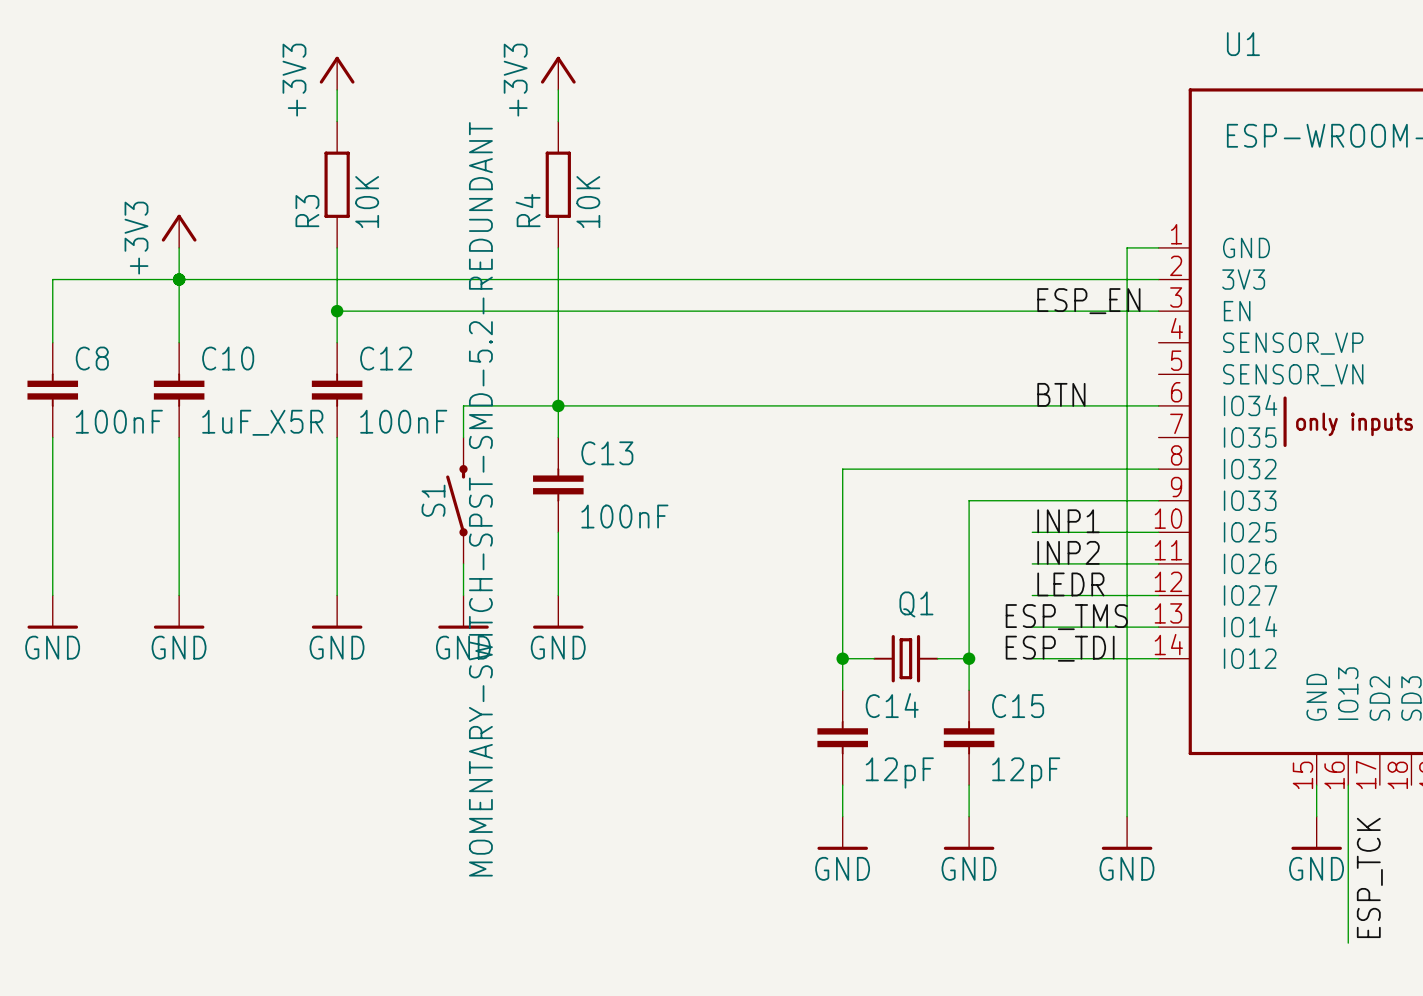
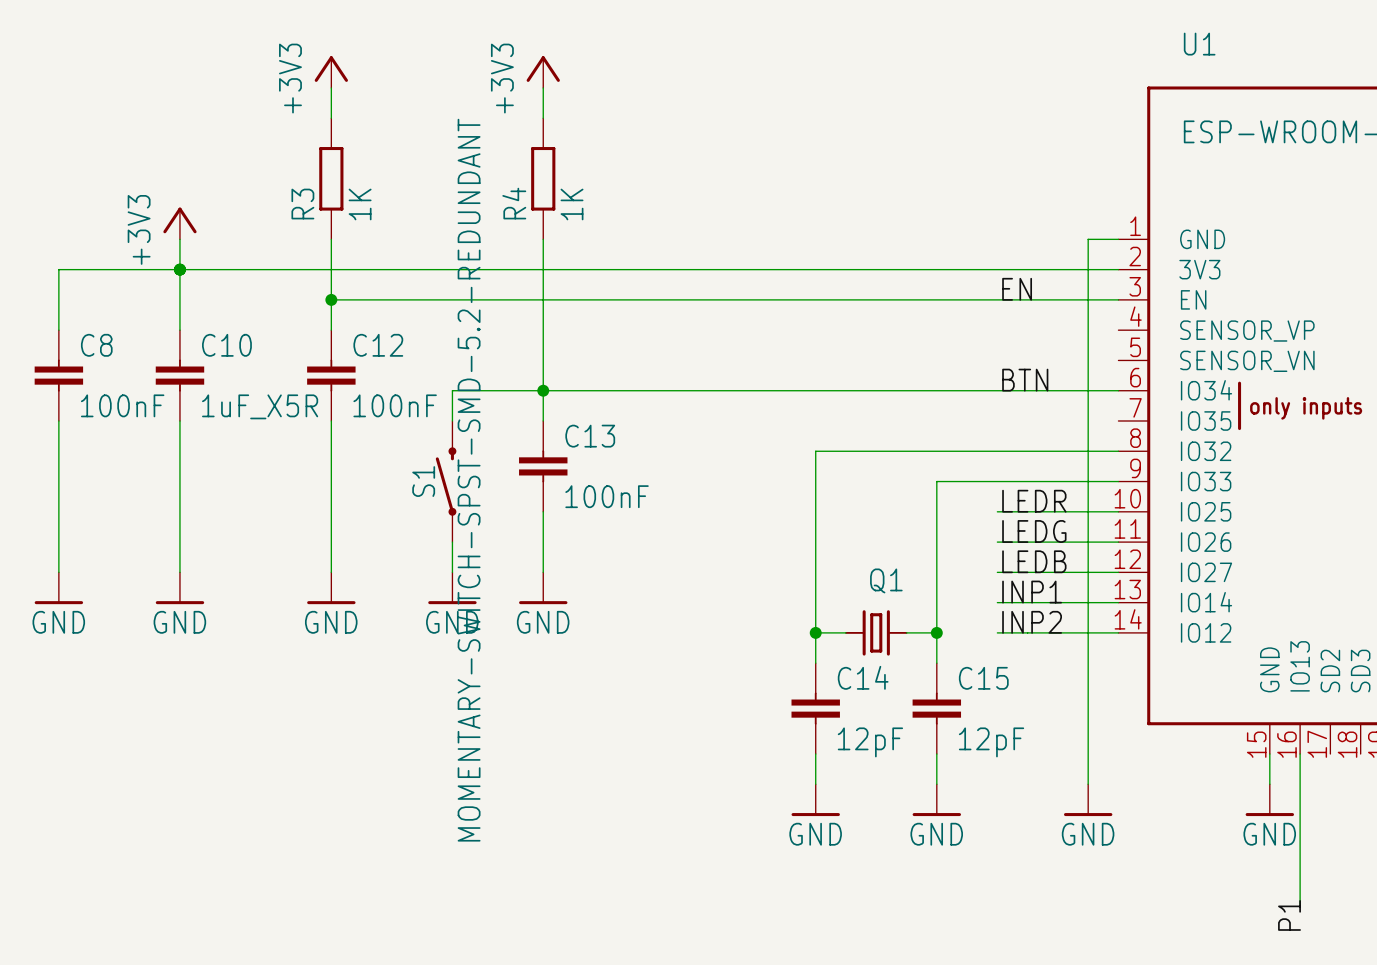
R3 value: 10K (367, 202) -> 1K (360, 204)
R4 value: 10K (588, 202) -> 1K (572, 204)
label: ESP_EN (1088, 301) -> EN (1017, 289)
label: INP1 (1068, 521) -> LEDR (1034, 501)
label: INP2 (1068, 552) -> LEDG (1034, 531)
label: LEDR (1070, 584) -> LEDB (1034, 561)
label: none -> INP1 (1032, 592)
label: ESP_TMS (1066, 617) -> none
label: none -> INP2 (1032, 622)
label: ESP_TDI (1060, 648) -> none
label: ESP_TCK (1369, 877) -> none
label: none -> P1 (1289, 915)

